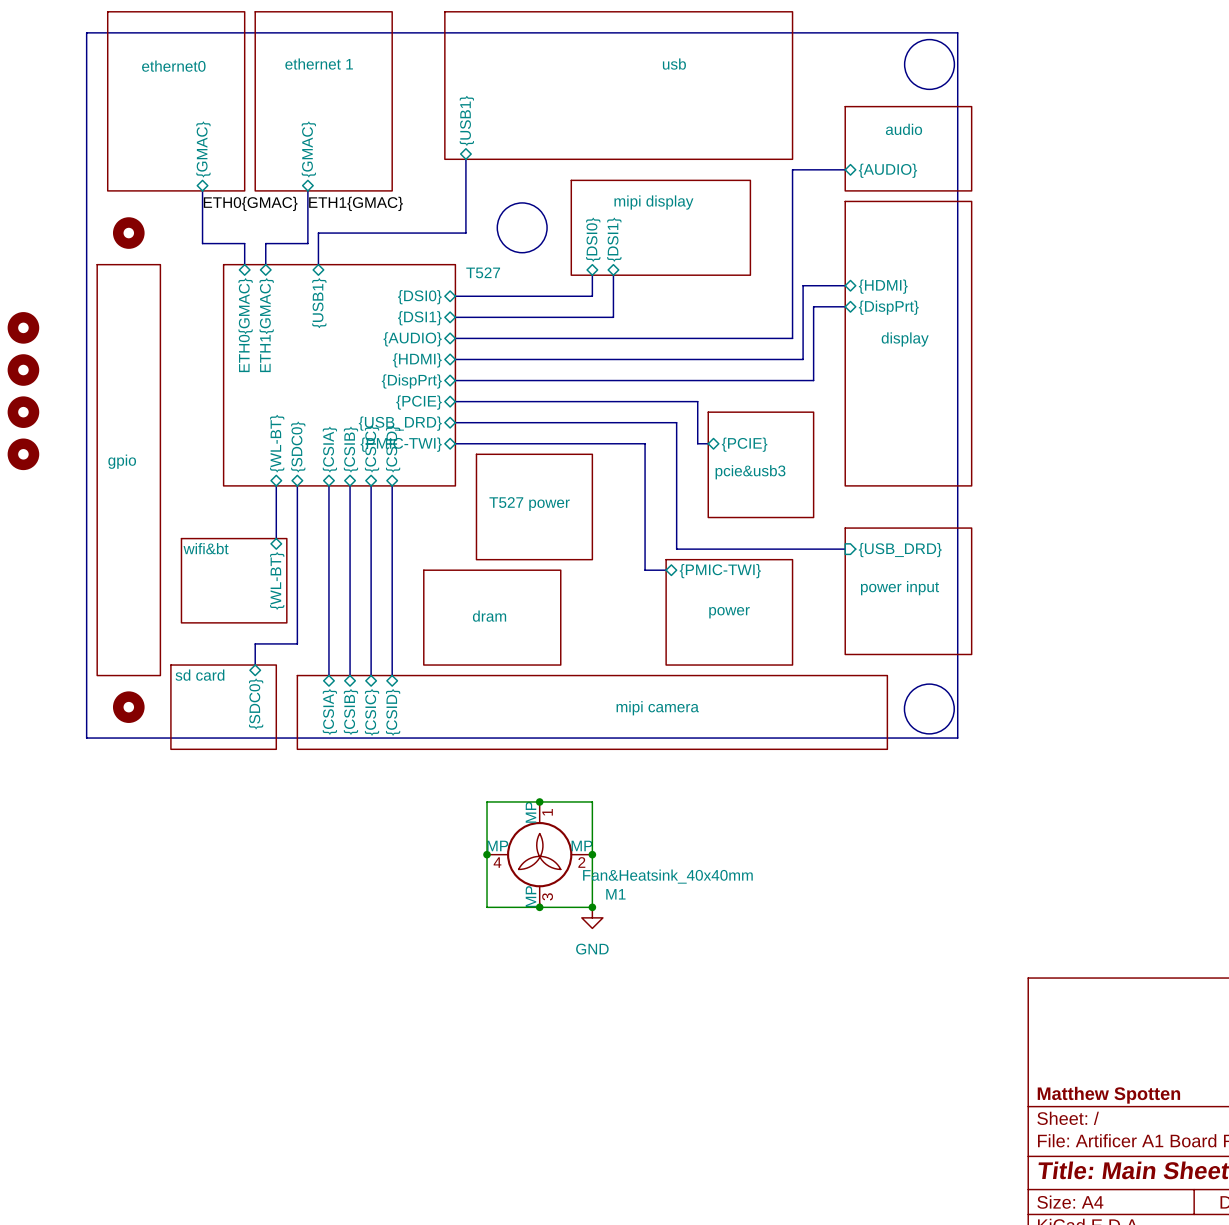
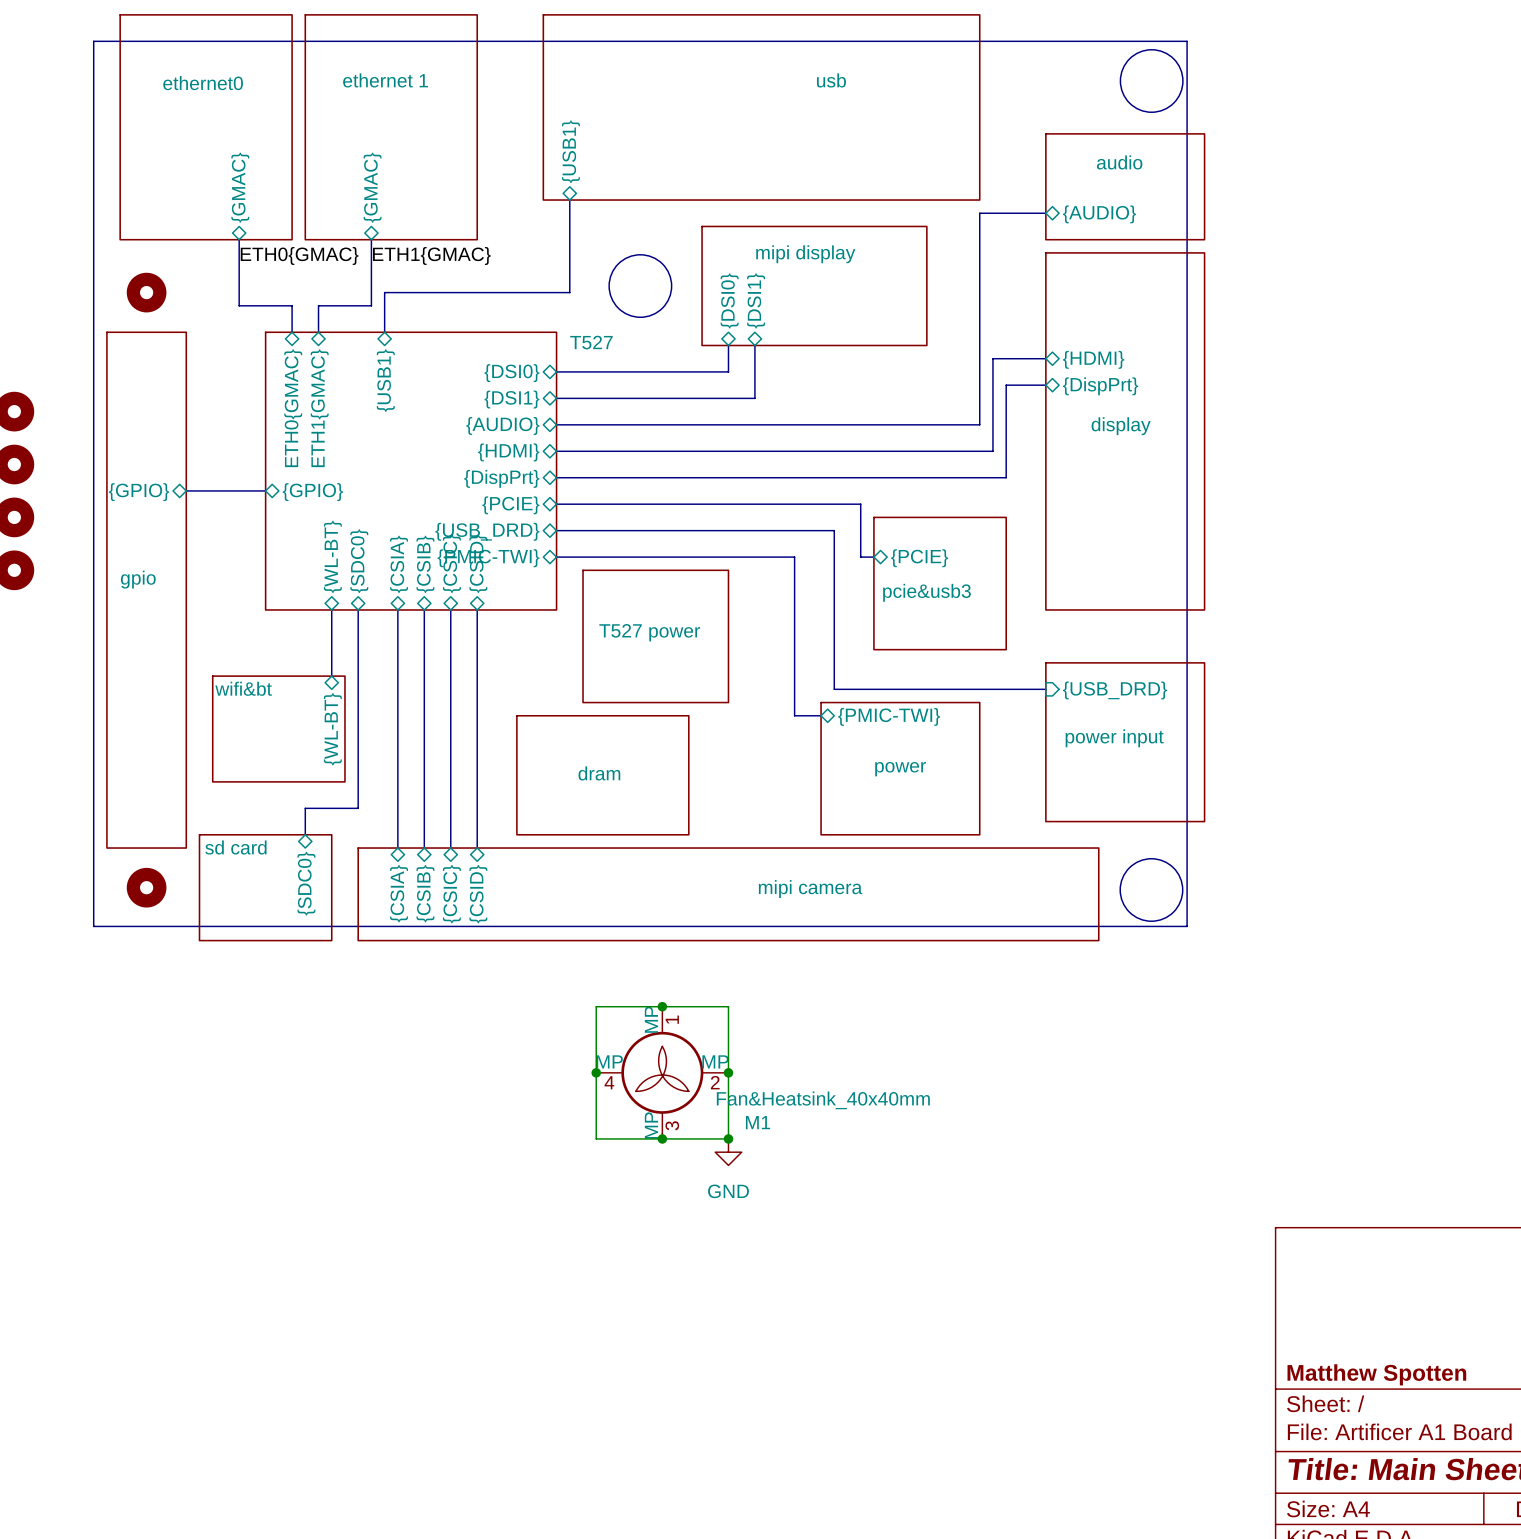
bus: none -> (186, 490) (265, 490)
sheet pin: none -> {GPIO} (139, 492)
sheet pin: none -> {GPIO} (312, 492)

